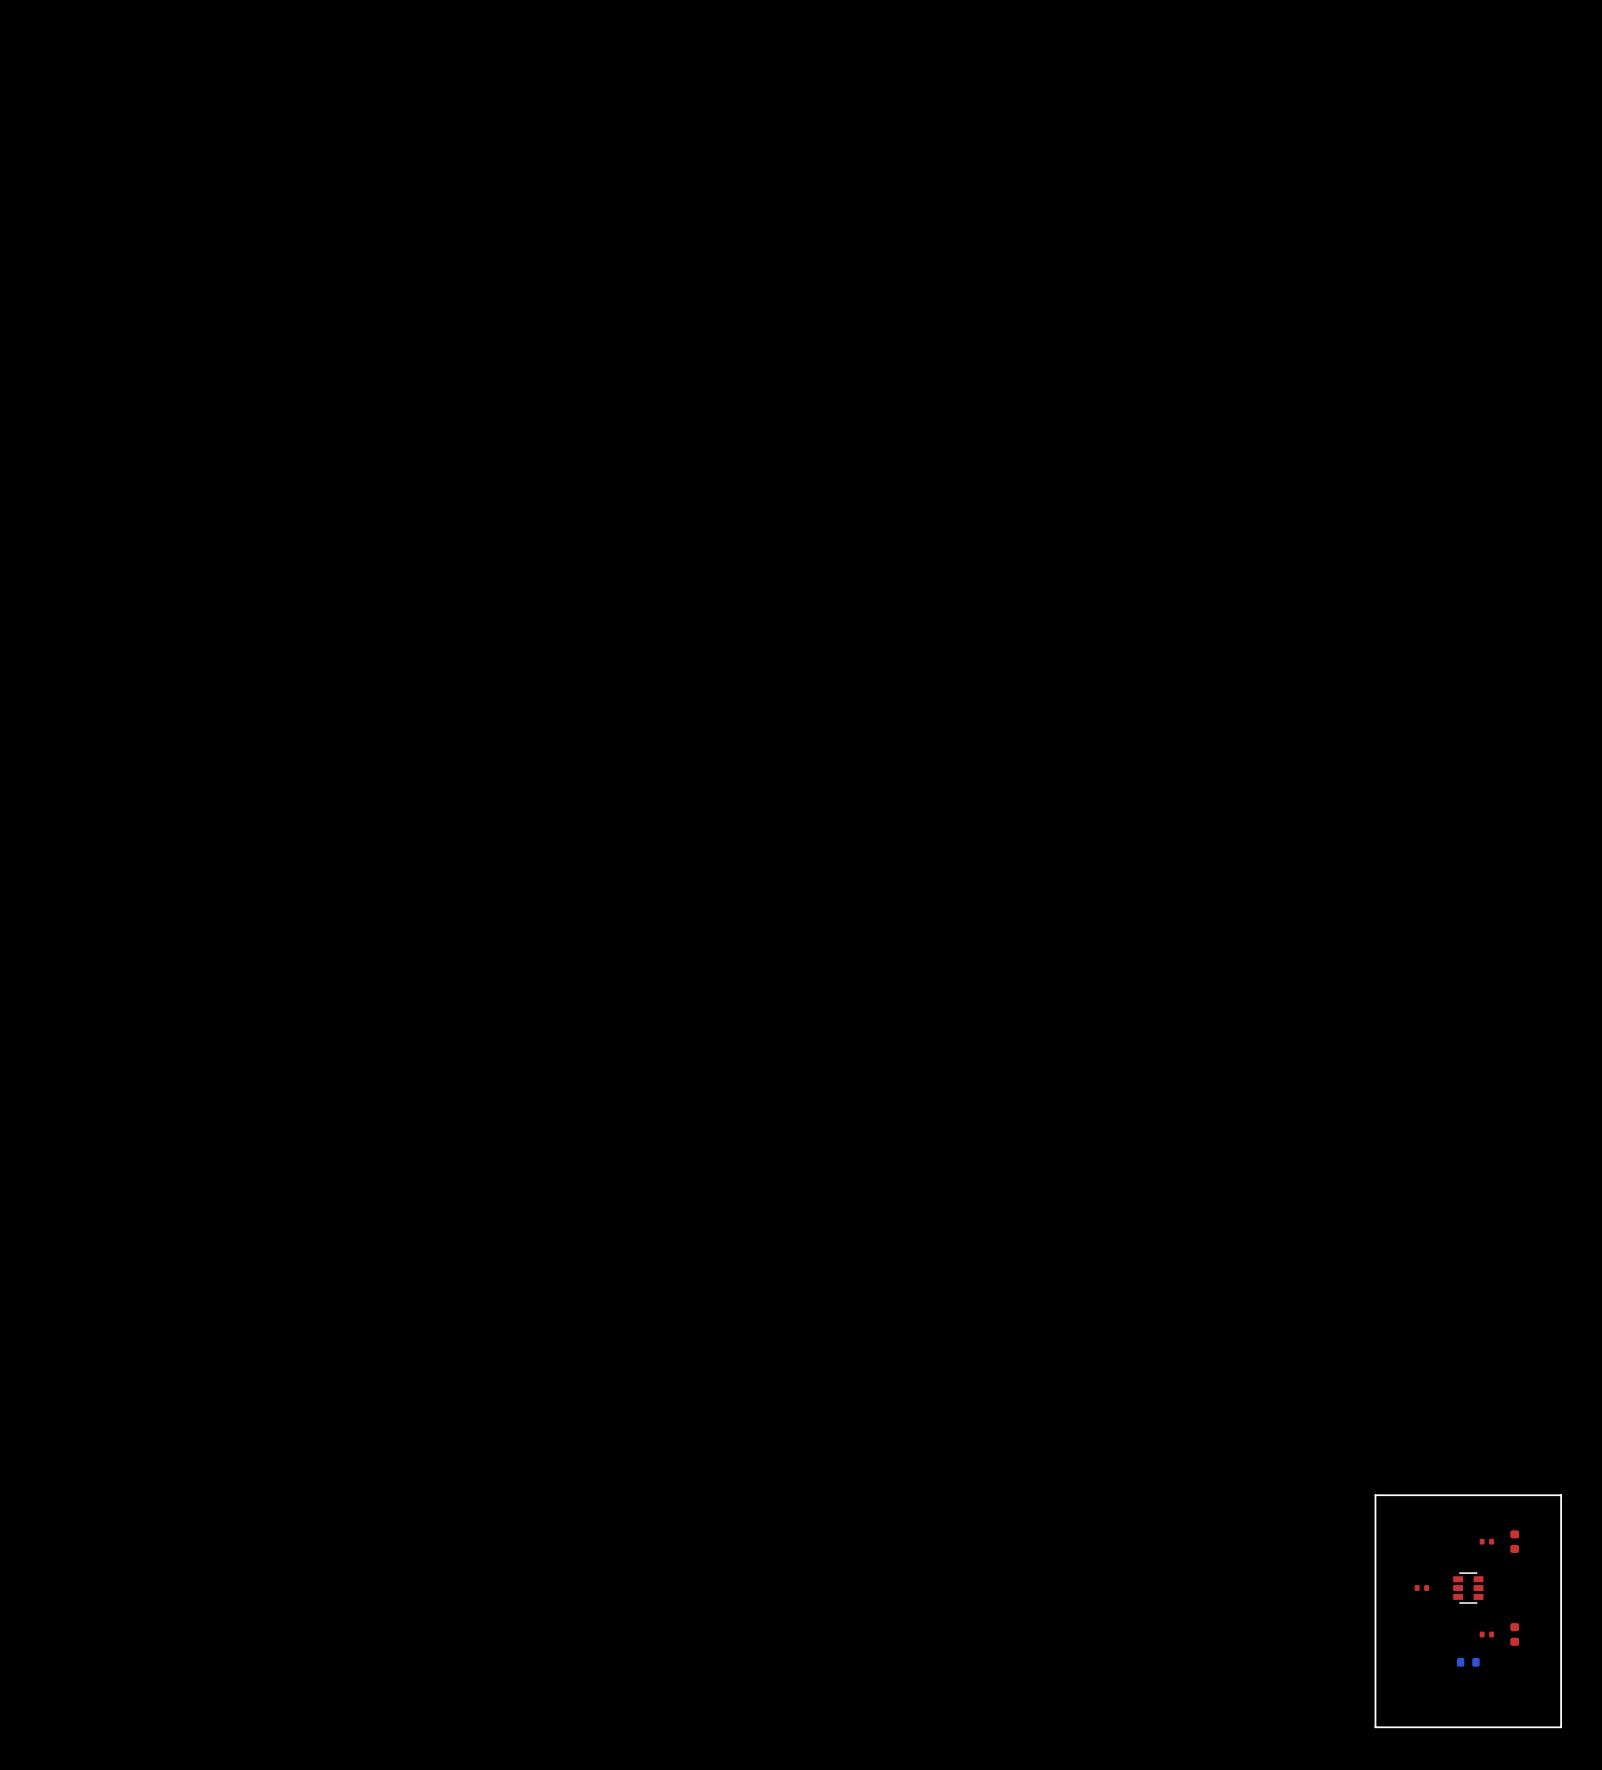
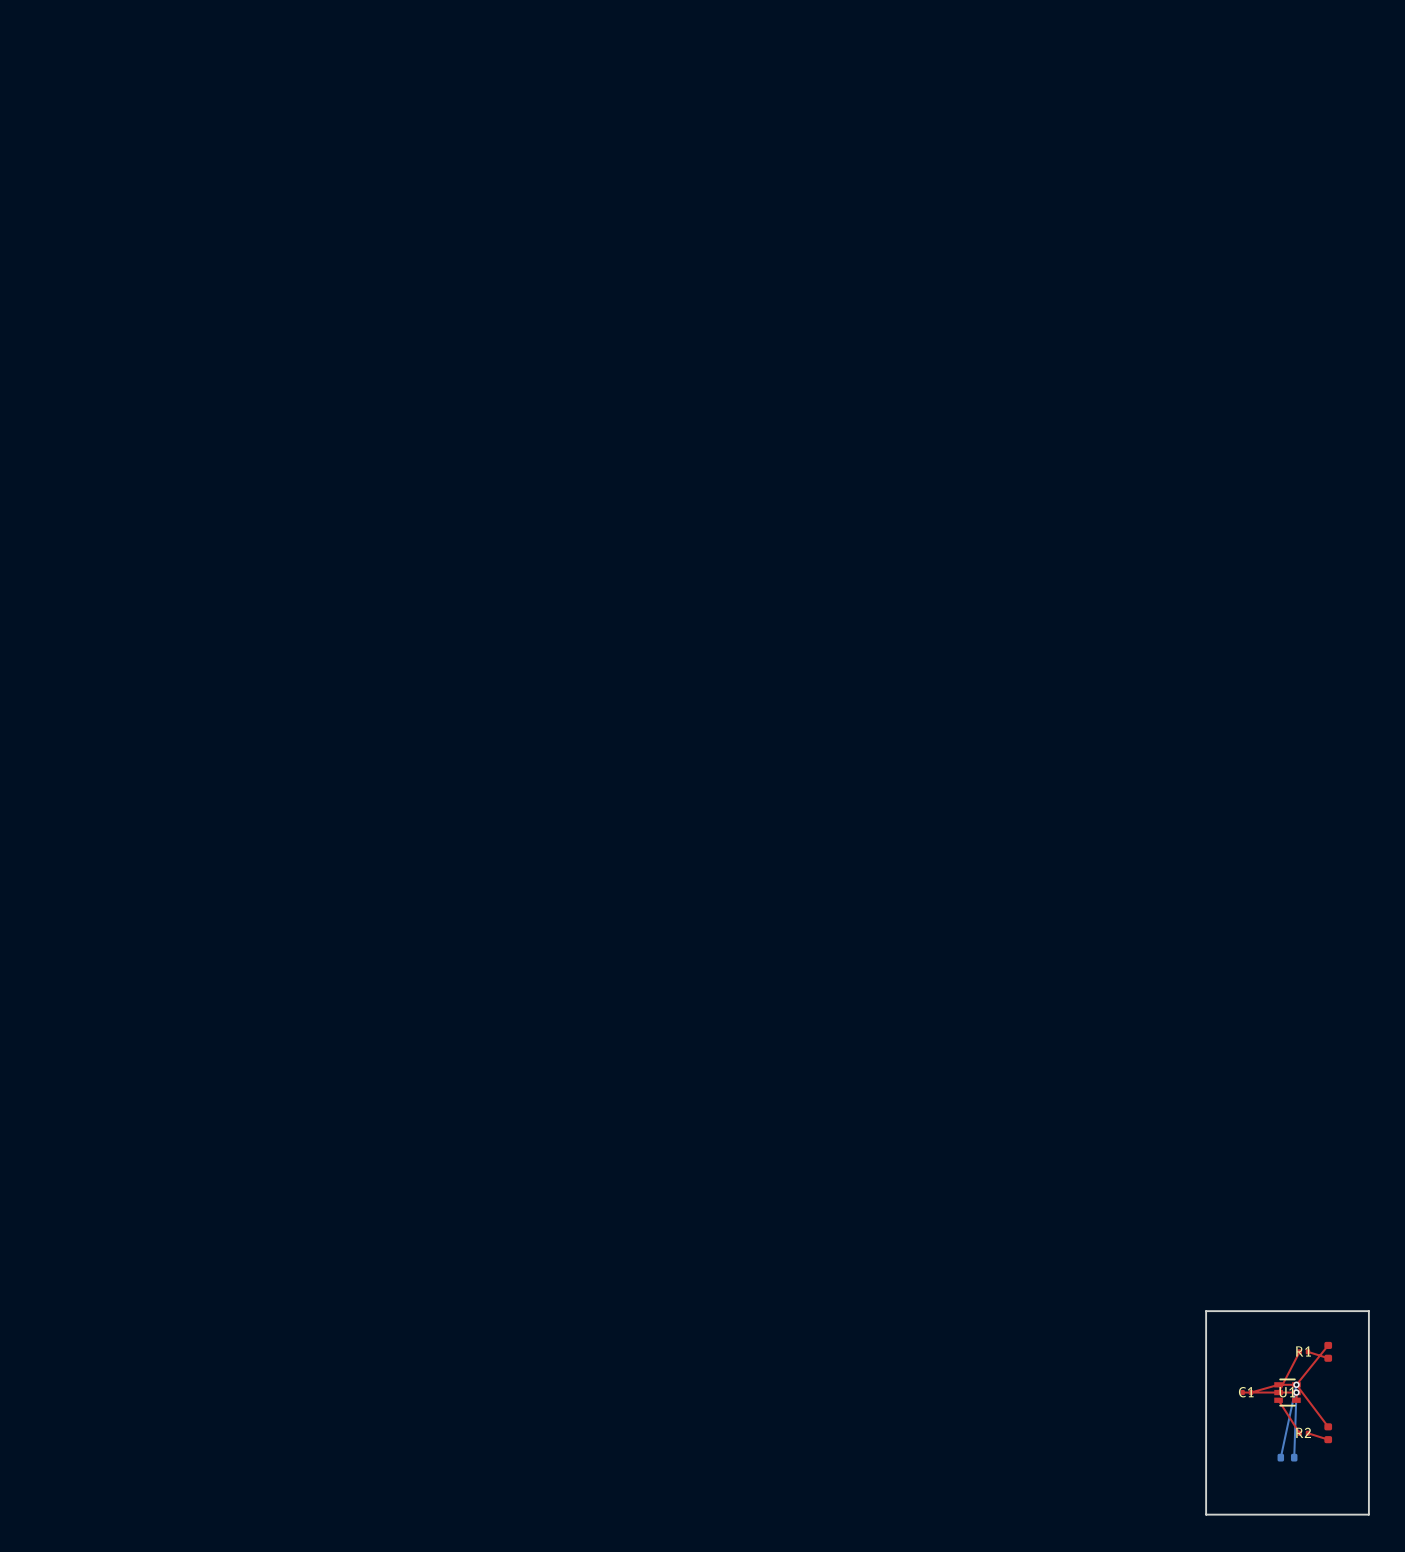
top track: none -> (1328, 1345) (1296, 1384)
top track: none -> (1299, 1351) (1278, 1392)
R1 name: none -> R1 (1303, 1351)
top track: none -> (1307, 1351) (1328, 1358)
top track: none -> (1296, 1384) (1278, 1384) (1250, 1392)
top track: none -> (1296, 1384) (1328, 1426)
bottom track: none -> (1296, 1384) (1280, 1457)
via: none -> (1296, 1384)
C1 name: none -> C1 (1246, 1392)
U1 name: none -> U1 (1287, 1392)
top track: none -> (1242, 1392) (1296, 1392) (1296, 1400)
bottom track: none -> (1296, 1392) (1294, 1457)
via: none -> (1296, 1392)
top track: none -> (1278, 1400) (1299, 1433)
R2 name: none -> R2 (1303, 1432)
top track: none -> (1307, 1433) (1328, 1439)

